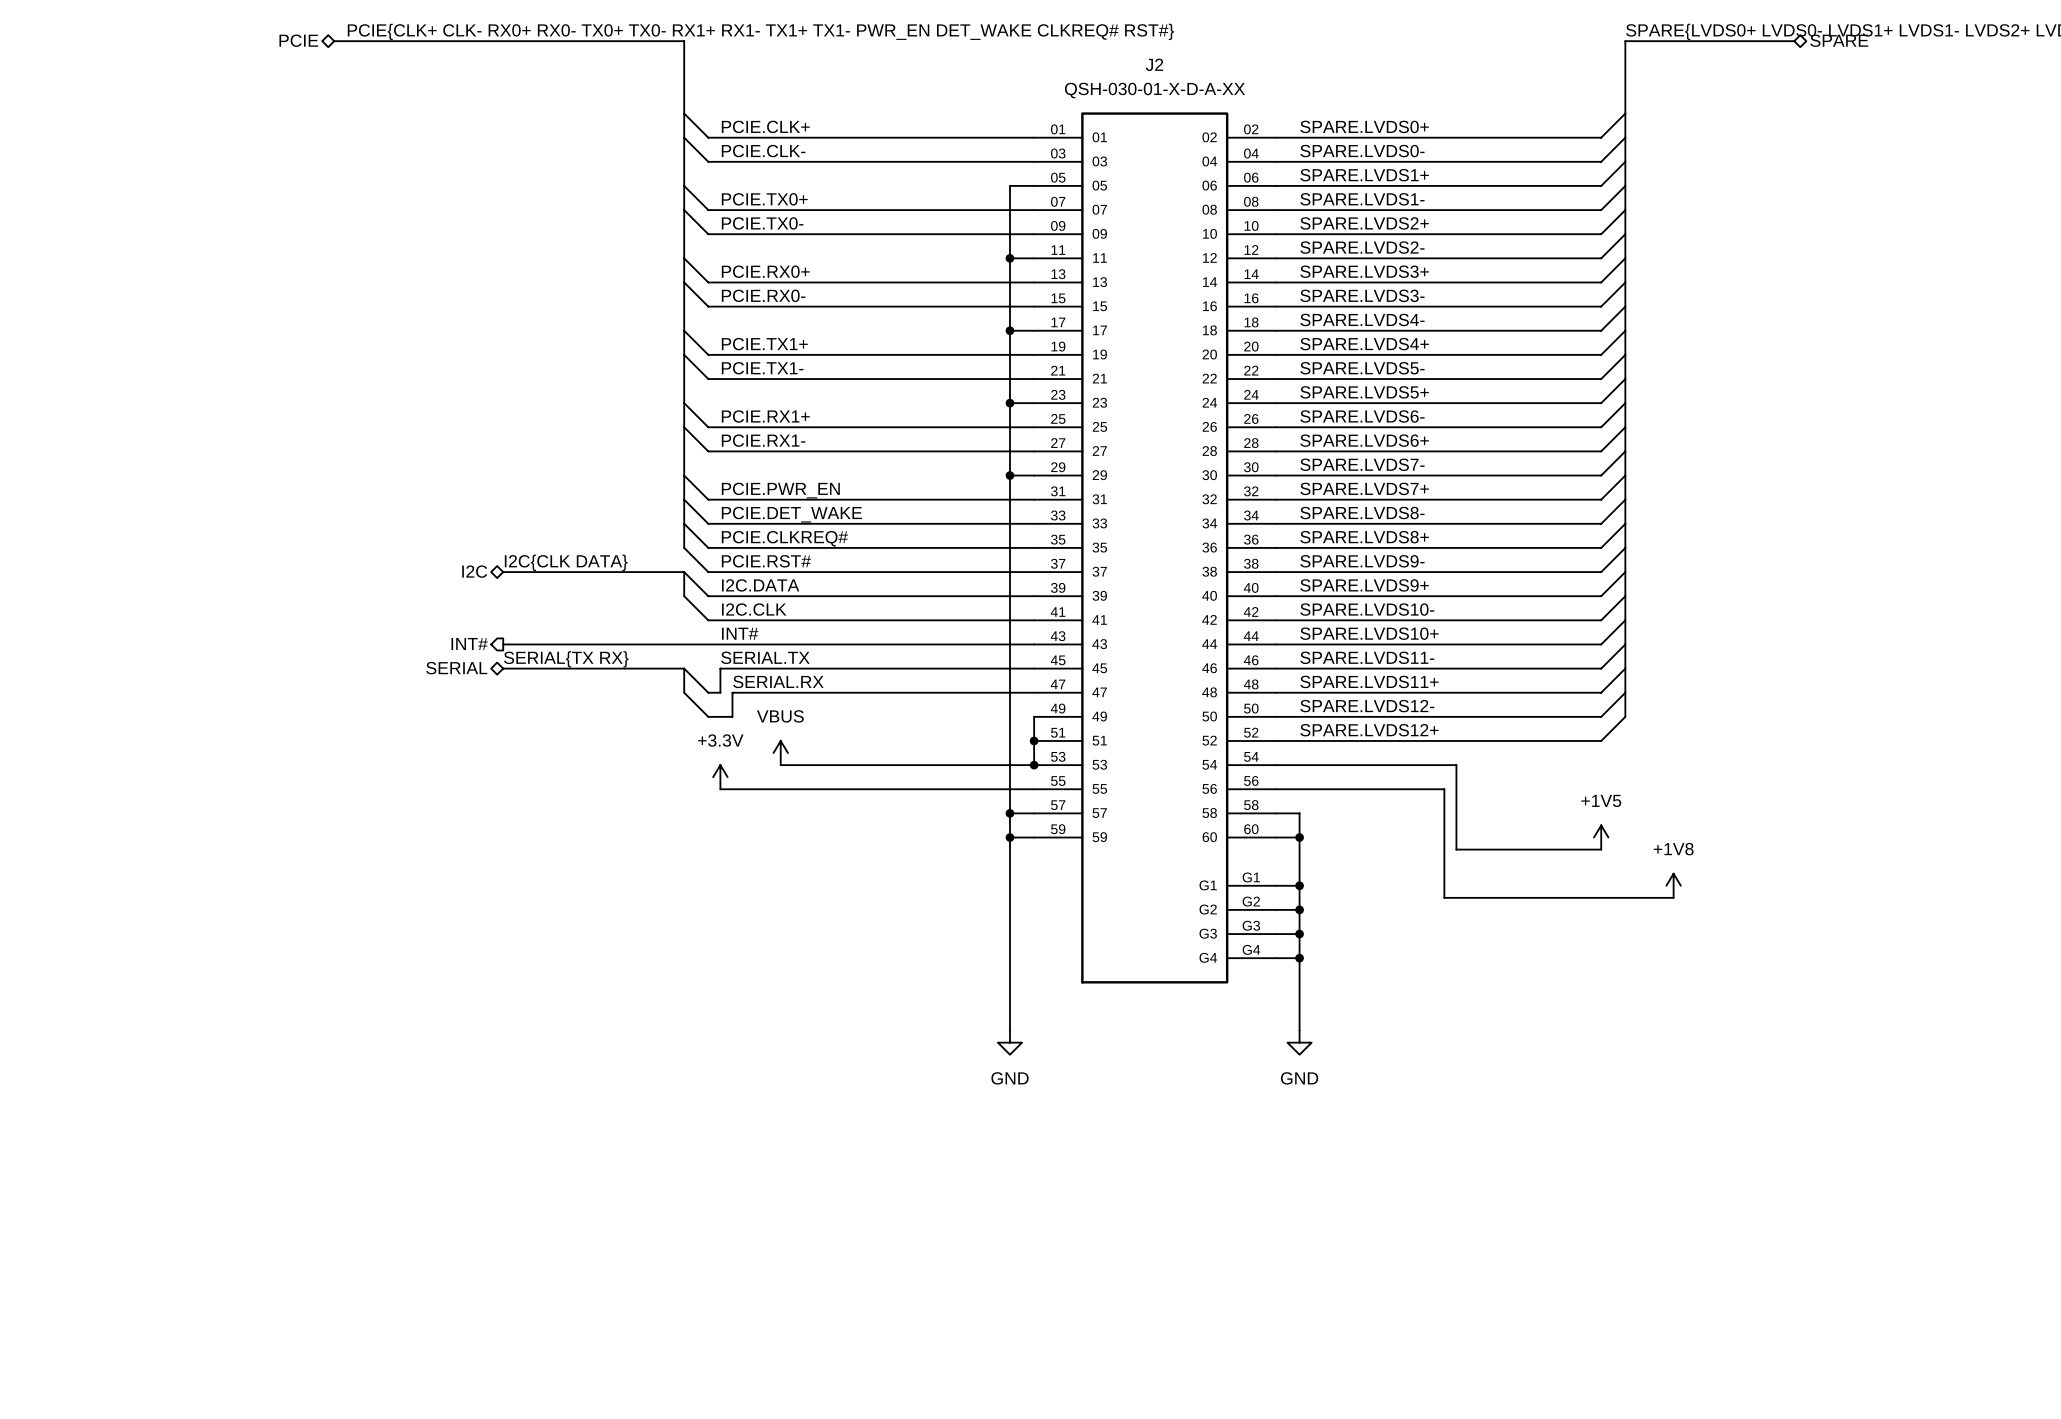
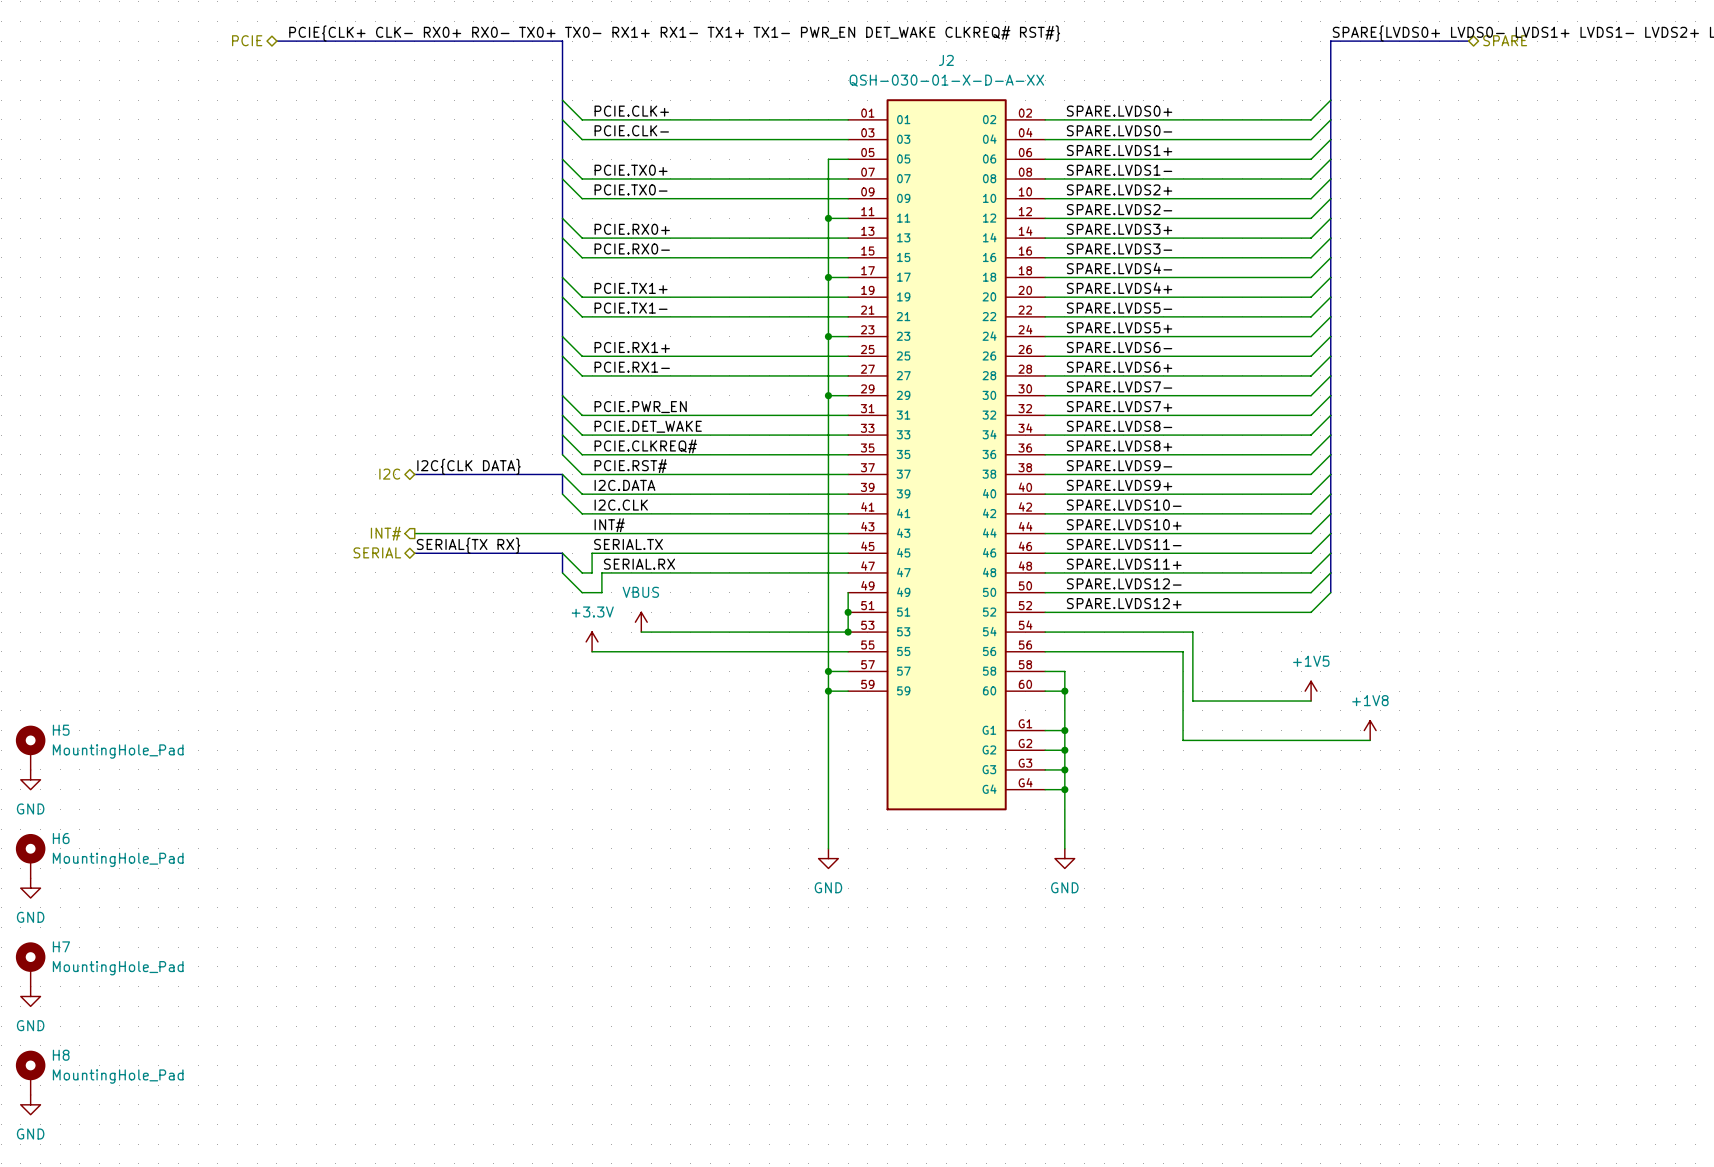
H5: none -> MountingHole_Pad (30, 747)
power symbol: none -> GND (30, 779)
H6: none -> MountingHole_Pad (30, 856)
power symbol: none -> GND (30, 888)
H7: none -> MountingHole_Pad (30, 964)
power symbol: none -> GND (30, 996)
H8: none -> MountingHole_Pad (30, 1072)
power symbol: none -> GND (30, 1104)

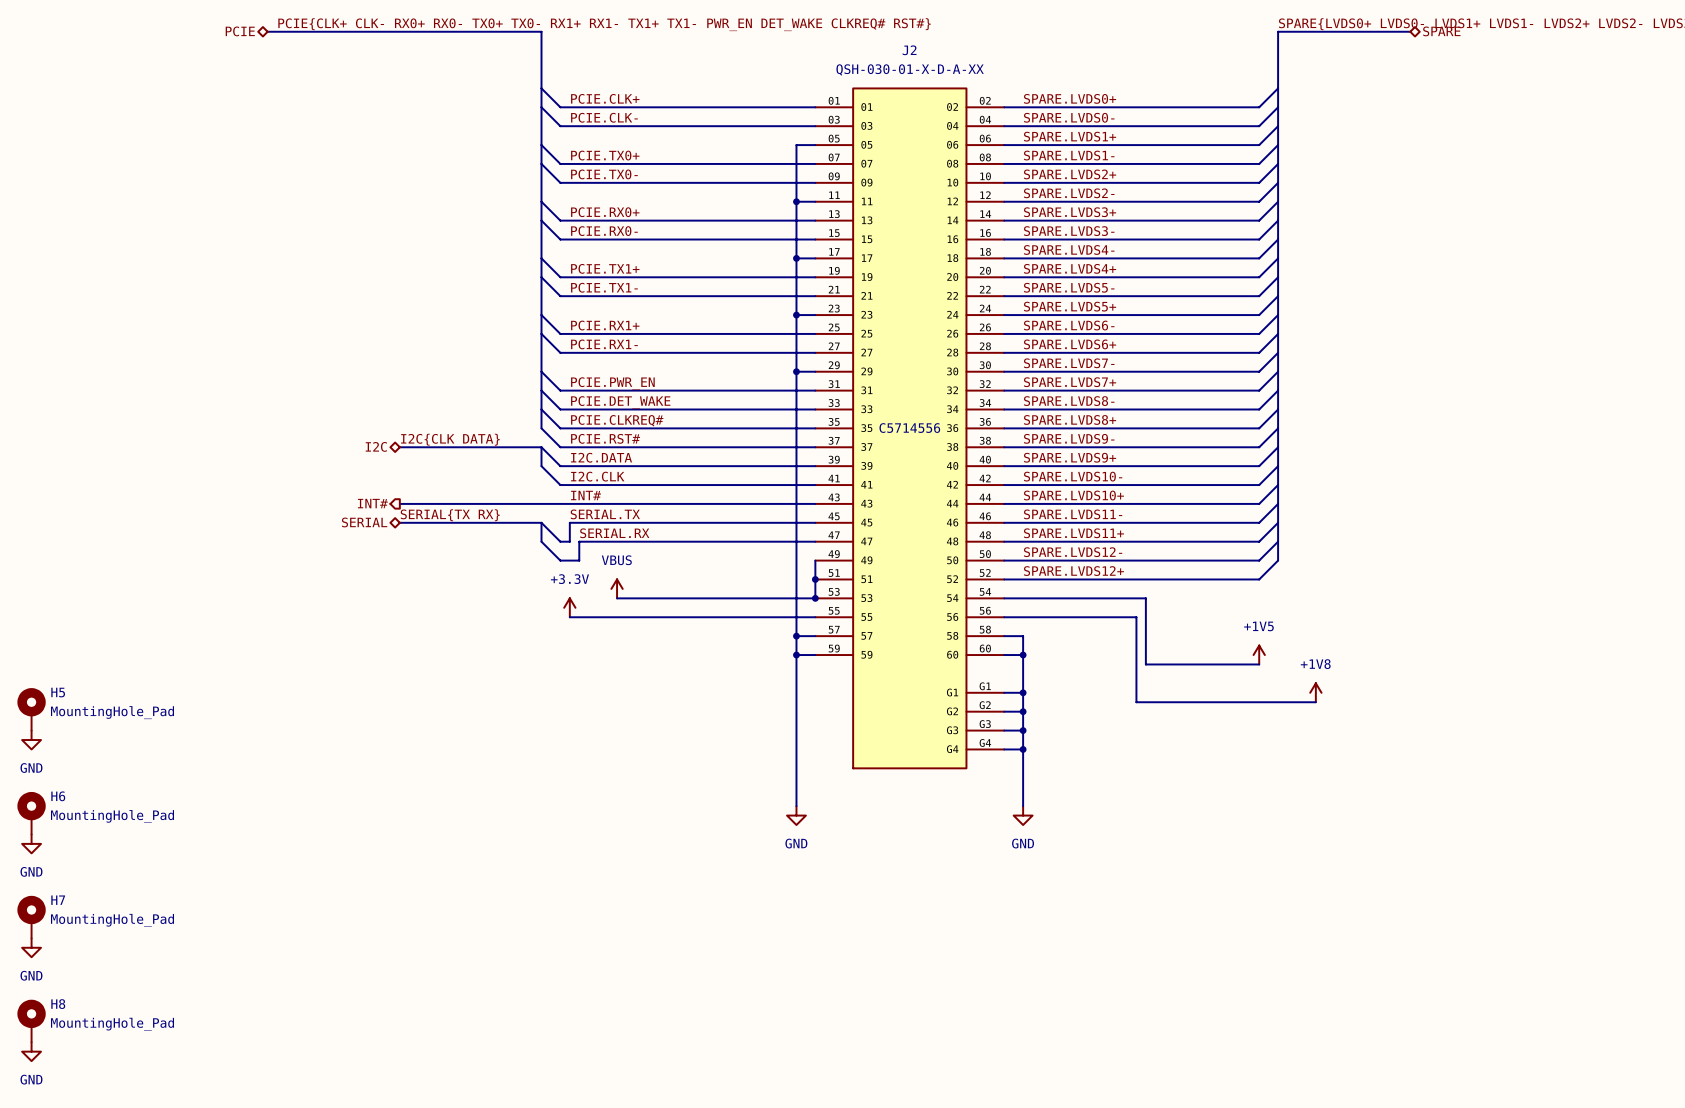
J2 text: none -> C5714556 (909, 428)

